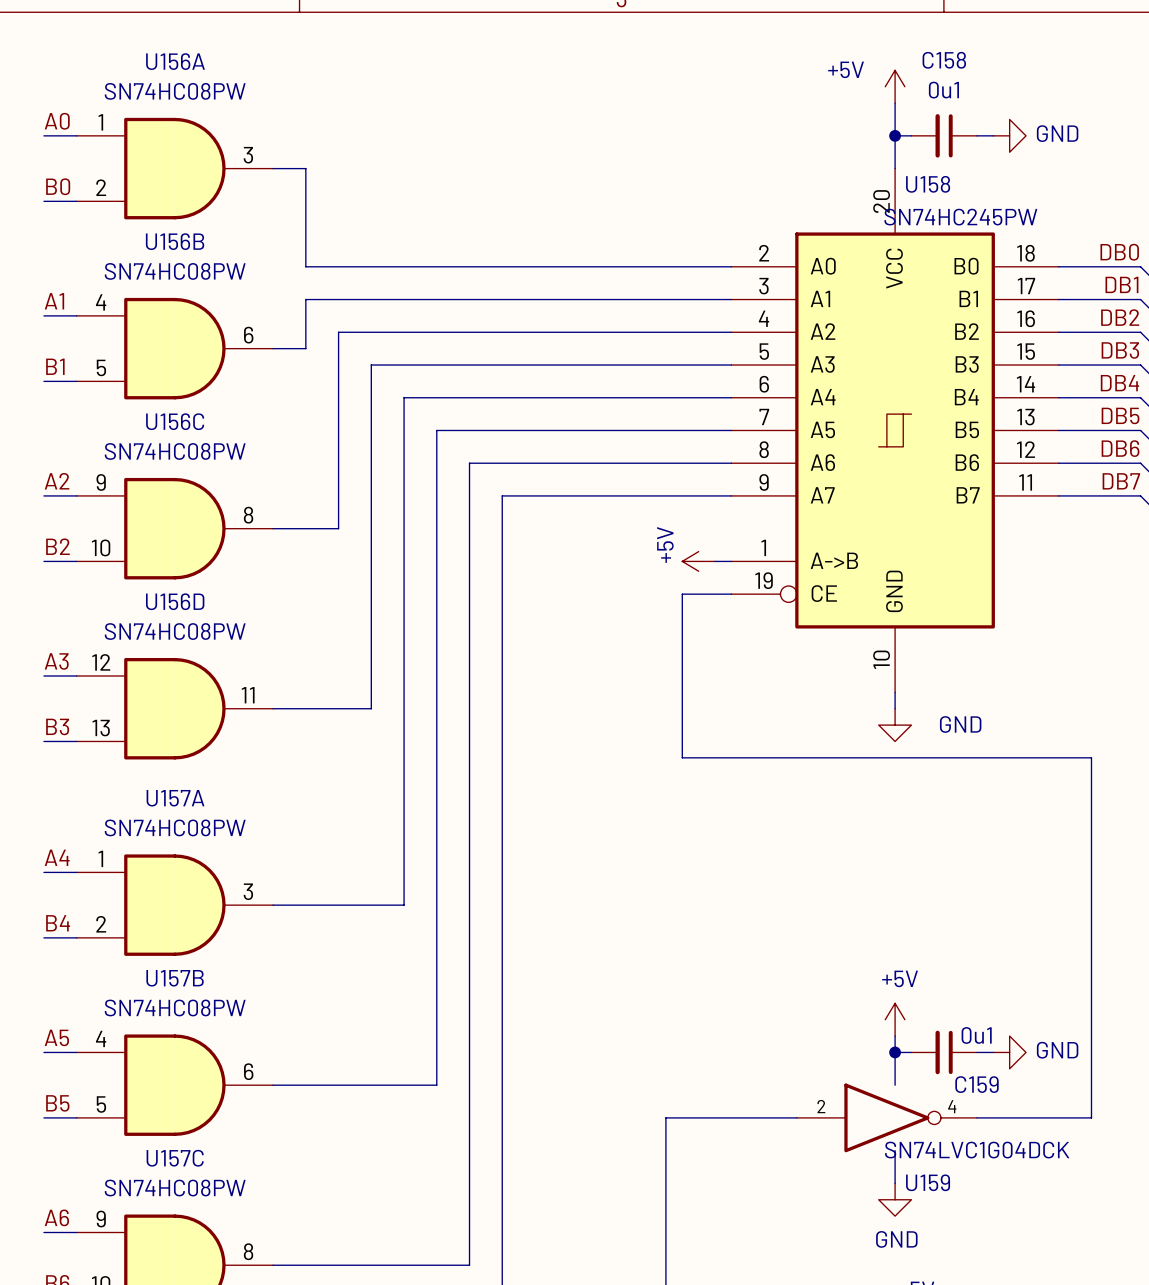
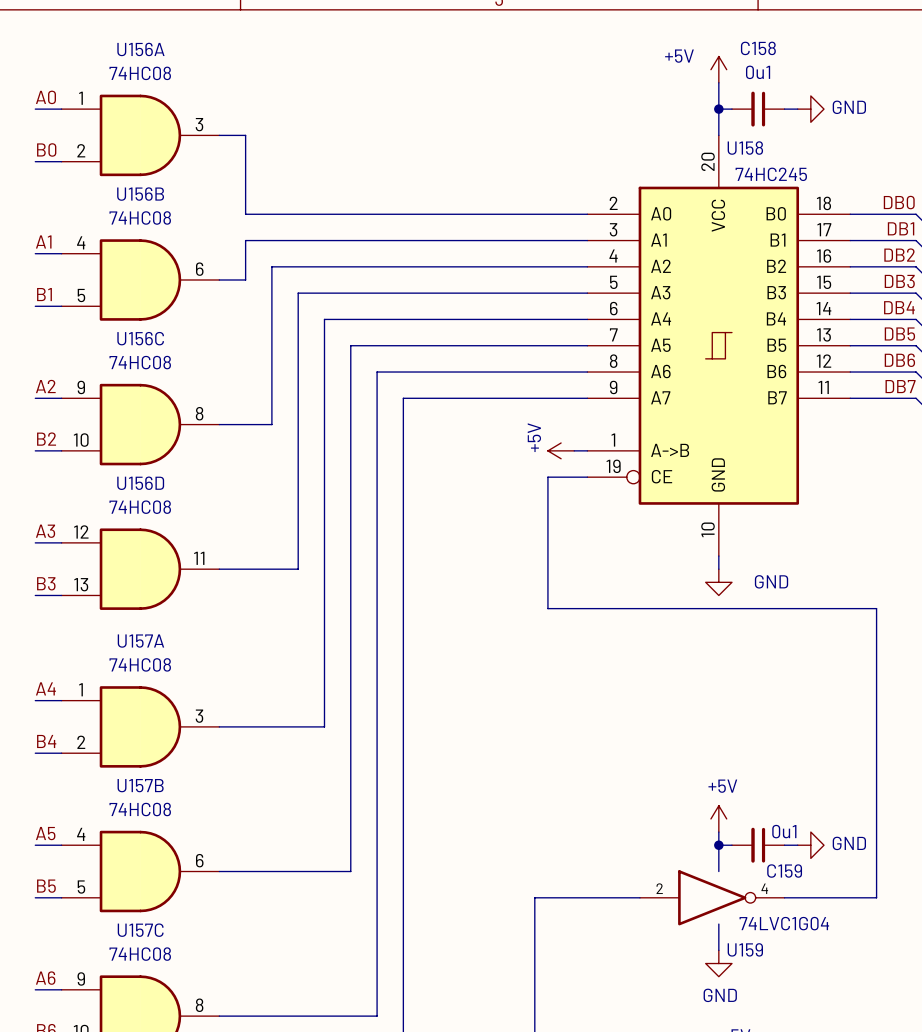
U156A value: SN74HC08PW (175, 91) -> 74HC08 (140, 73)
U158 value: SN74HC245PW (960, 217) -> 74HC245 (771, 174)
U156B value: SN74HC08PW (175, 271) -> 74HC08 (140, 217)
U156C value: SN74HC08PW (175, 451) -> 74HC08 (140, 362)
U156D value: SN74HC08PW (175, 631) -> 74HC08 (140, 507)
U157A value: SN74HC08PW (175, 827) -> 74HC08 (140, 664)
U157B value: SN74HC08PW (175, 1007) -> 74HC08 (140, 809)
U159 value: SN74LVC1G04DCK (977, 1150) -> 74LVC1G04 (784, 923)
U157C value: SN74HC08PW (175, 1188) -> 74HC08 (140, 954)

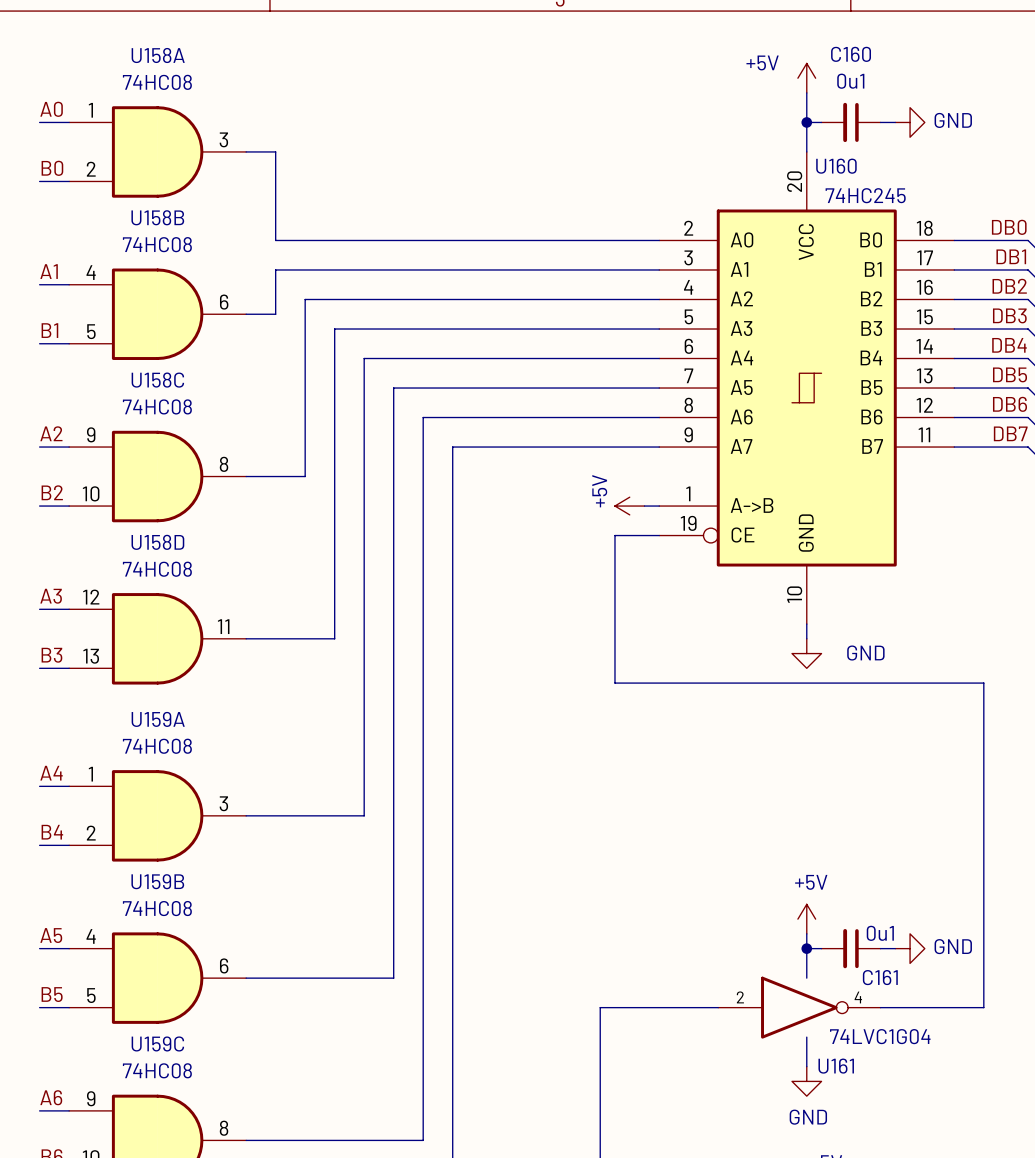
C158 name: C158 (758, 48) -> C160 (851, 54)
U156A name: U156A (140, 49) -> U158A (158, 55)
U158 name: U158 (745, 148) -> U160 (836, 166)
U156B name: U156B (140, 194) -> U158B (157, 217)
U156C name: U156C (140, 338) -> U158C (157, 380)
U156D name: U156D (140, 483) -> U158D (157, 542)
U157A name: U157A (140, 641) -> U159A (158, 719)
U157B name: U157B (140, 785) -> U159B (157, 881)
C159 name: C159 (784, 871) -> C161 (880, 977)
U157C name: U157C (140, 930) -> U159C (157, 1043)
U159 name: U159 (745, 949) -> U161 (836, 1066)

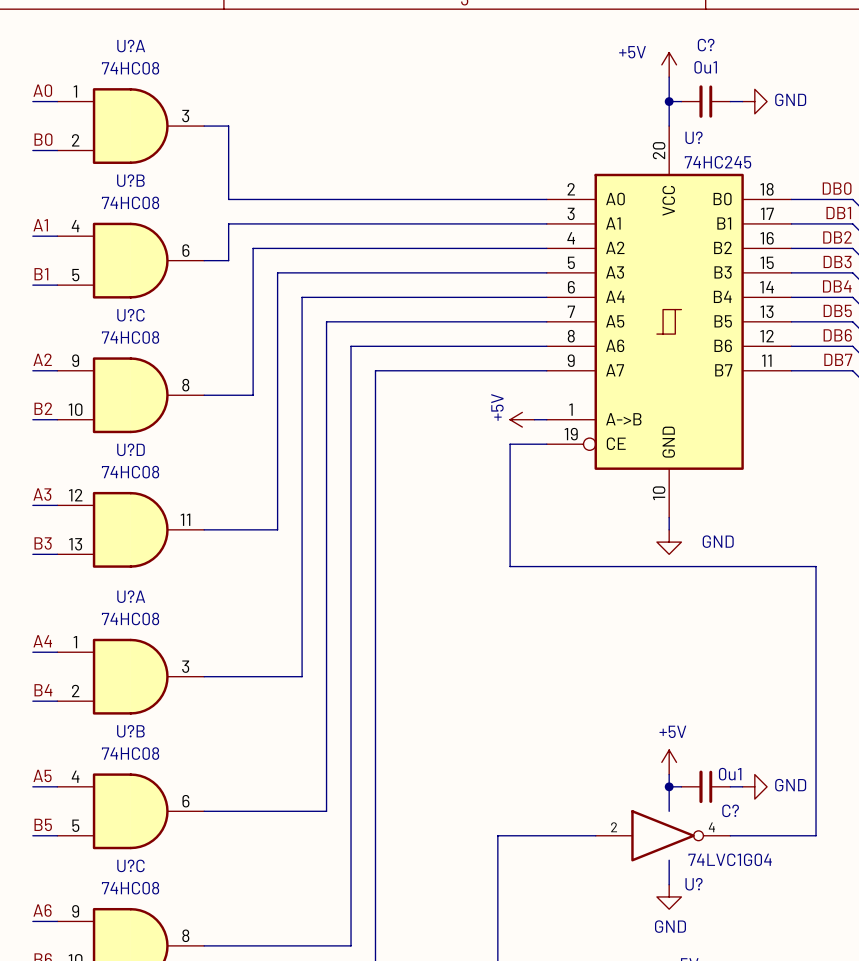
C160 name: C160 (851, 54) -> C? (706, 45)
U158A name: U158A (158, 55) -> U?A (131, 46)
U160 name: U160 (836, 166) -> U? (694, 137)
U158B name: U158B (157, 217) -> U?B (130, 180)
U158C name: U158C (157, 380) -> U?C (130, 315)
U158D name: U158D (157, 542) -> U?D (130, 449)
U159A name: U159A (158, 719) -> U?A (131, 596)
U159B name: U159B (157, 881) -> U?B (130, 731)
C161 name: C161 (880, 977) -> C? (730, 810)
U159C name: U159C (157, 1043) -> U?C (130, 865)
U161 name: U161 (836, 1066) -> U? (694, 884)

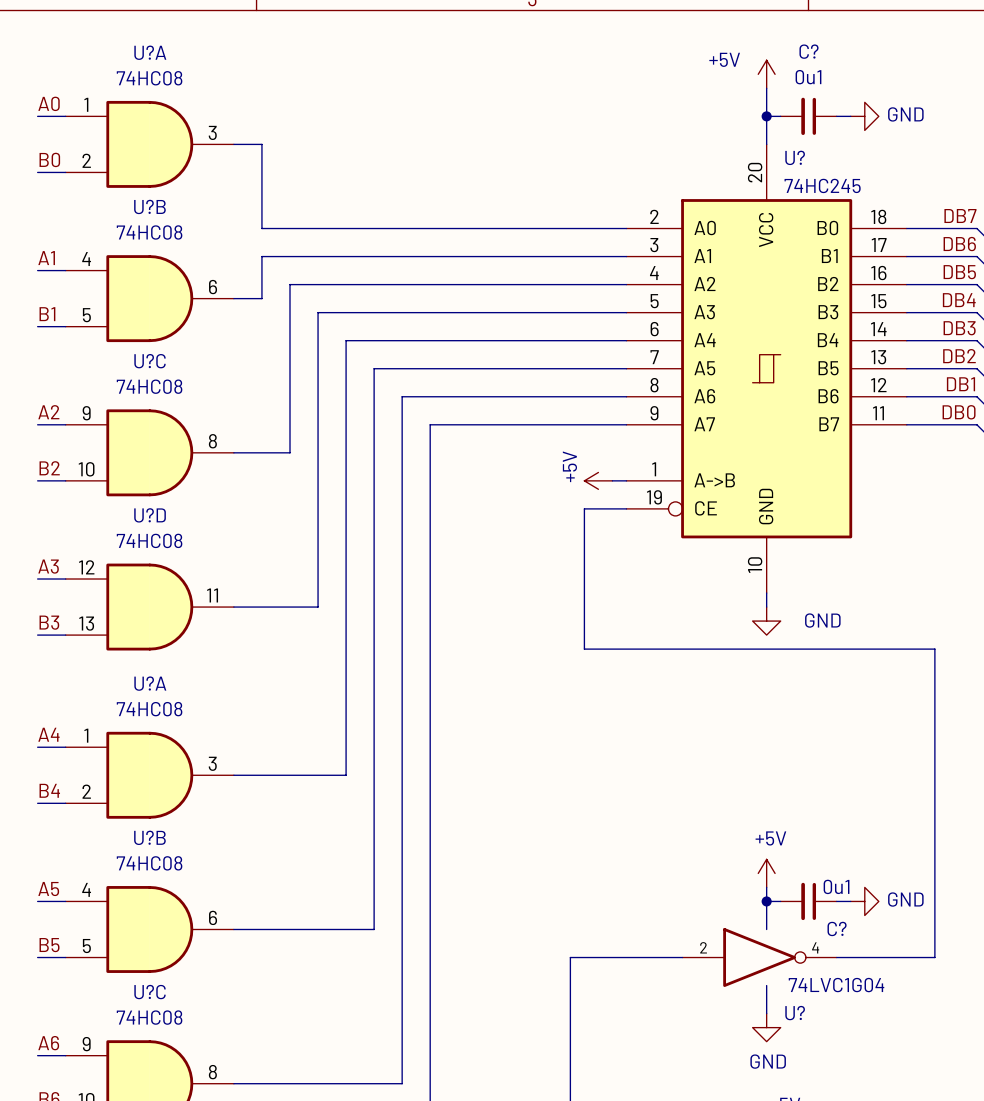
label: DB0 (837, 188) -> DB7 (960, 216)
label: DB1 (838, 213) -> DB6 (959, 244)
label: DB2 (837, 237) -> DB5 (959, 272)
label: DB3 (837, 262) -> DB4 (959, 300)
label: DB4 (837, 286) -> DB3 (959, 328)
label: DB5 (837, 310) -> DB2 (959, 356)
label: DB6 (837, 335) -> DB1 (960, 384)
label: DB7 (838, 359) -> DB0 (959, 412)

